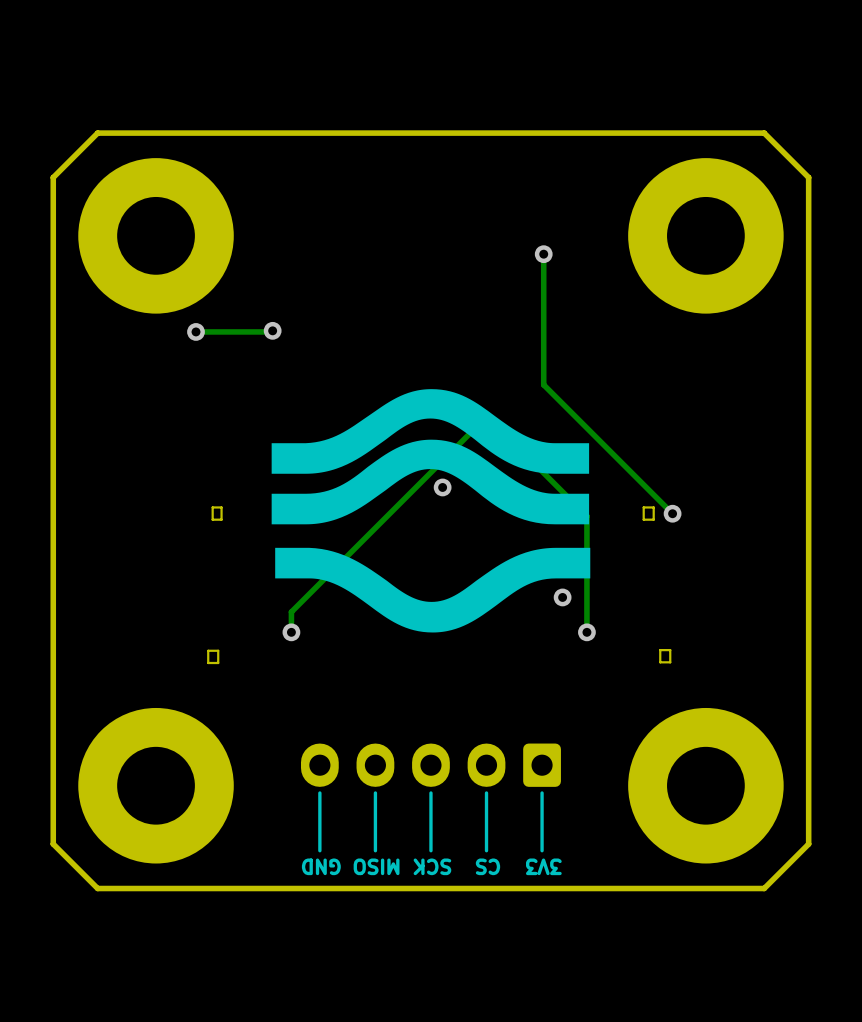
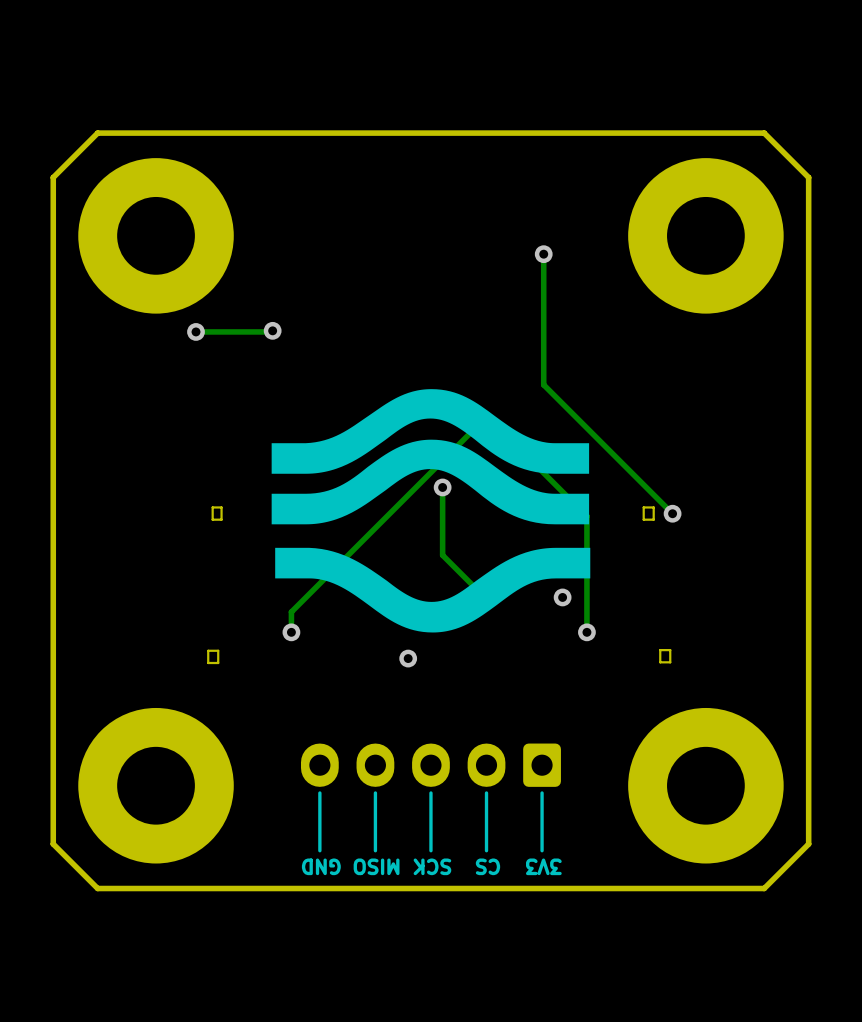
track: none -> (442, 487) (442, 555) (480, 593)
via: none -> (408, 658)

